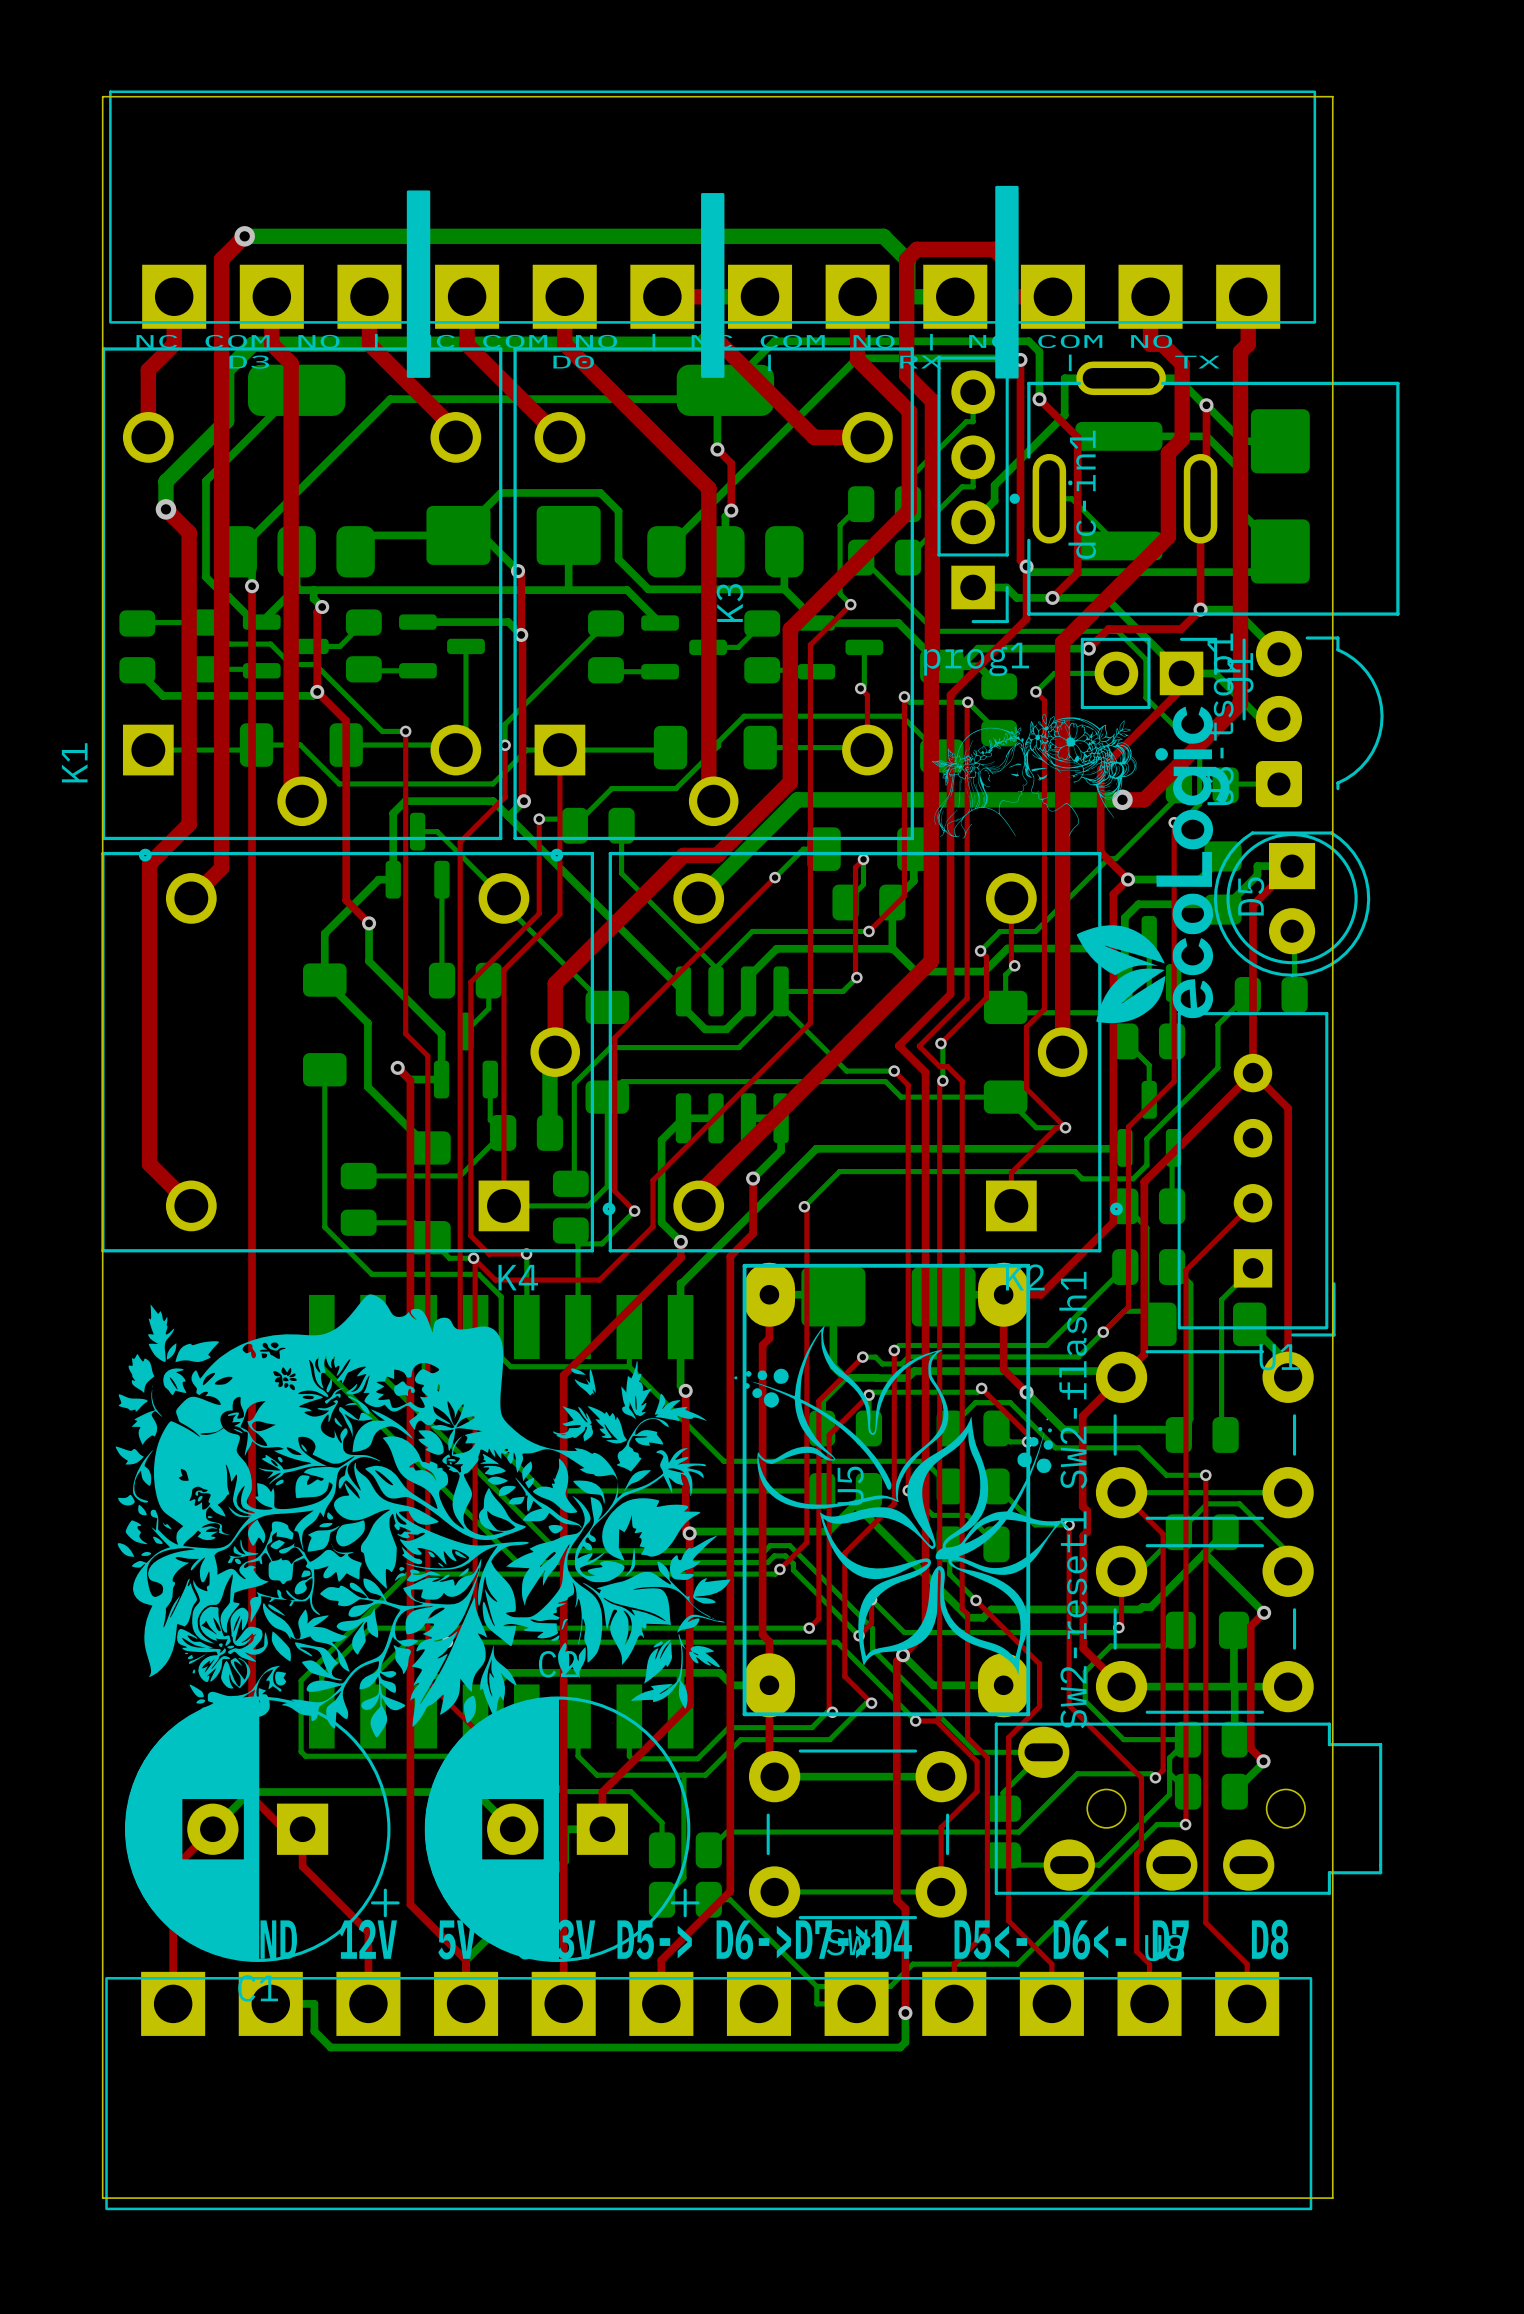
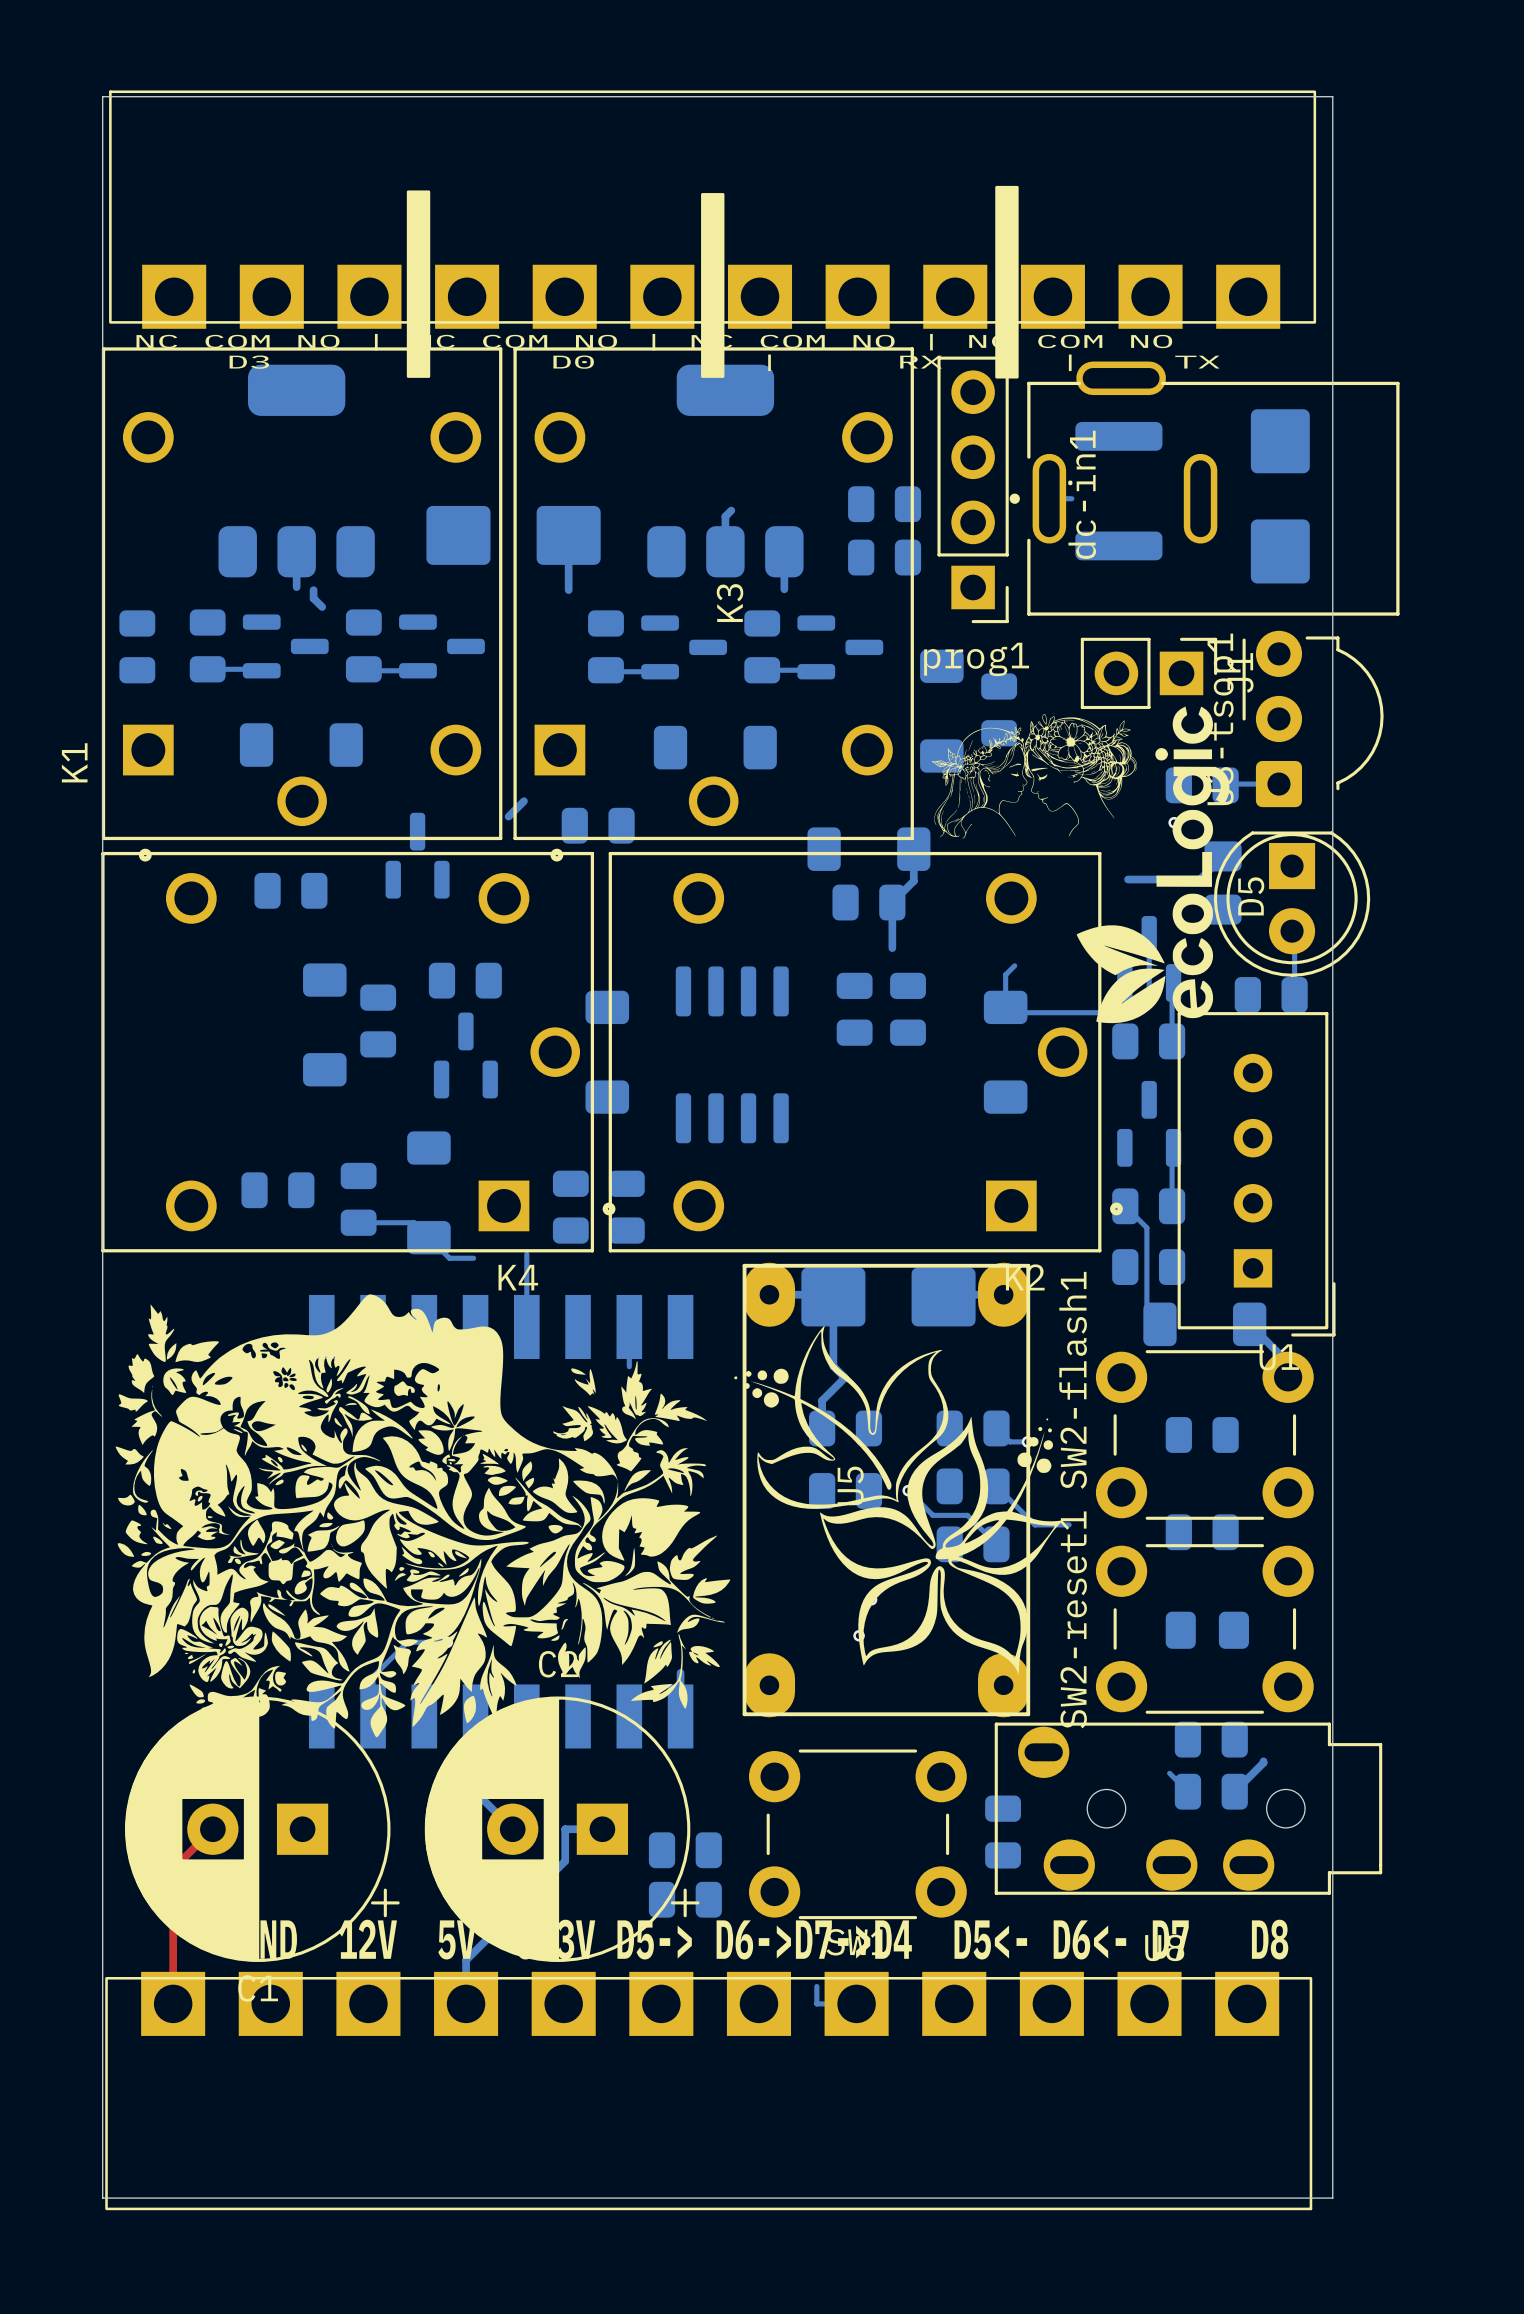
bottom track: (244, 236) (883, 236) (907, 260) (907, 296) (955, 296) -> none
top track: (244, 236) (221, 259) (221, 868) (191, 898) -> none
via: (244, 236) -> none
top track: (174, 296) (174, 344) (148, 370) (148, 437) -> none
top track: (271, 296) (271, 344) (291, 363) (291, 790) (302, 801) -> none
top track: (369, 296) (369, 344) (455, 430) (455, 437) -> none
top track: (467, 296) (467, 344) (559, 437) -> none
top track: (564, 296) (564, 344) (708, 488) (708, 796) (713, 801) -> none
top track: (662, 296) (709, 296) (709, 332) (814, 437) (867, 437) -> none
bottom track: (760, 296) (712, 296) (712, 332) (701, 344) (252, 344) (226, 370) (226, 420) (165, 481) (165, 509) -> none
top track: (857, 296) (857, 359) (909, 411) (909, 510) (790, 629) (790, 782) (717, 855) (683, 855) (555, 983) (555, 1052) -> none
top track: (1052, 296) (1005, 296) (1005, 260) (994, 249) (916, 249) (906, 259) (906, 375) (932, 401) (931, 961) (698, 1193) (698, 1205) -> none
top track: (1150, 296) (1150, 344) (1162, 344) (1182, 363) (1182, 439) (1168, 453) (1168, 536) (1062, 642) (1062, 1052) -> none
top track: (1248, 296) (1248, 344) (1240, 351) (1240, 703) (1144, 799) (1122, 799) -> none
bottom track: (1020, 359) (1018, 358) (857, 358) (666, 549) (666, 551) -> none
top track: (1020, 359) (1020, 560) (1026, 566) (1026, 618) (950, 694) (950, 994) (898, 1045) (925, 1072) (925, 1632) (896, 1661) (896, 1900) (905, 1908) (905, 2012) -> none
via: (1020, 359) -> none
bottom track: (296, 390) (205, 480) (205, 577) (254, 622) (261, 622) (296, 587) (299, 590) (627, 590) (660, 623) -> none
bottom track: (973, 392) (973, 421) (966, 421) (907, 479) (907, 504) -> none
bottom track: (717, 399) (390, 399) (237, 551) (252, 566) (252, 586) -> none
bottom track: (1039, 399) (1039, 351) (1028, 341) (774, 341) (717, 398) (717, 449) -> none
top track: (1039, 399) (1077, 437) (1077, 572) (1052, 597) -> none
via: (1039, 399) -> none
top track: (1206, 405) (1206, 492) (1200, 498) (1200, 609) (1181, 629) (1108, 629) (1088, 648) -> none
via: (1206, 405) -> none
bottom track: (1118, 436) (1206, 436) (1237, 467) (1237, 508) (1280, 551) (1259, 572) (1032, 572) (1026, 566) -> none
bottom track: (1280, 441) (1242, 441) (1177, 378) (1064, 378) (1064, 415) (994, 485) (994, 500) (973, 522) -> none
top track: (717, 449) (731, 463) (731, 510) -> none
via: (717, 449) -> none
bottom track: (973, 457) (973, 486) (962, 486) (935, 513) (935, 529) (907, 557) -> none
bottom track: (1071, 498) (1118, 545) -> none
bottom track: (861, 504) (840, 525) (840, 593) (850, 604) -> none
top track: (165, 509) (189, 532) (189, 824) (149, 863) (149, 1164) (191, 1205) -> none
via: (165, 509) -> none
via: (731, 510) -> none
bottom track: (458, 535) (500, 492) (600, 492) (618, 511) (618, 559) (648, 589) (784, 589) (816, 623) (898, 623) (941, 666) (978, 666) (999, 686) -> none
bottom track: (355, 551) (371, 535) (482, 535) (518, 571) -> none
bottom track: (861, 557) (934, 631) (1117, 631) (1145, 659) (1145, 697) (1199, 751) (1199, 803) (1180, 822) (1174, 822) -> none
via: (1026, 566) -> none
top track: (518, 571) (521, 574) (523, 801) -> none
via: (518, 571) -> none
top track: (252, 586) (252, 1797) (302, 1847) -> none
via: (252, 586) -> none
bottom track: (973, 587) (1006, 587) (1016, 597) (1106, 597) (1181, 673) (1214, 673) (1260, 718) (1278, 718) -> none
via: (1052, 597) -> none
top track: (850, 604) (810, 644) (810, 1022) (652, 1180) (652, 1226) (599, 1280) (495, 1280) (473, 1258) -> none
via: (850, 604) -> none
top track: (322, 607) (317, 611) (317, 691) (346, 720) (346, 900) (369, 923) -> none
via: (322, 607) -> none
bottom track: (1200, 609) (1234, 609) (1278, 653) -> none
via: (1200, 609) -> none
bottom track: (363, 622) (339, 646) (309, 646) -> none
bottom track: (417, 622) (508, 622) (521, 634) -> none
bottom track: (137, 623) (207, 622) (229, 644) (270, 644) (291, 664) (315, 664) (382, 731) (405, 731) -> none
bottom track: (605, 623) (505, 724) (505, 745) -> none
bottom track: (762, 623) (738, 647) (708, 647) -> none
via: (521, 634) -> none
bottom track: (465, 646) (465, 729) (450, 745) -> none
bottom track: (864, 647) (864, 684) (860, 688) -> none
bottom track: (1088, 648) (978, 648) (960, 666) -> none
via: (1088, 648) -> none
bottom track: (137, 670) (162, 695) (313, 695) (317, 691) -> none
bottom track: (1116, 673) (1054, 673) (1035, 691) -> none
top track: (1181, 673) (1181, 688) (1100, 769) (1100, 852) (1128, 879) (1113, 894) (1113, 1222) (1040, 1294) (1003, 1294) (1003, 1369) (1026, 1392) -> none
top track: (860, 688) (867, 695) (867, 750) -> none
via: (860, 688) -> none
via: (317, 691) -> none
top track: (1035, 691) (1044, 700) (1044, 1008) (1026, 1026) (1026, 1088) (1065, 1127) (1056, 1127) (1011, 1172) (1011, 1205) -> none
via: (1035, 691) -> none
bottom track: (904, 696) (909, 702) (968, 702) (999, 733) -> none
top track: (904, 696) (904, 896) (869, 931) -> none
via: (904, 696) -> none
top track: (967, 702) (967, 998) (919, 1046) (939, 1066) (947, 1066) (962, 1081) (962, 1608) (967, 1614) (967, 1737) (987, 1757) (987, 1930) (954, 1964) (954, 2003) -> none
via: (967, 702) -> none
top track: (405, 731) (405, 1033) (427, 1055) (427, 1681) (529, 1783) -> none
via: (405, 731) -> none
bottom track: (346, 745) (450, 745) -> none
top track: (505, 745) (505, 797) (460, 842) (461, 1389) -> none
via: (505, 745) -> none
bottom track: (670, 747) (668, 750) (526, 750) (492, 783) (339, 783) (300, 745) (256, 745) (251, 750) (148, 750) -> none
bottom track: (760, 747) (865, 747) (867, 750) -> none
top track: (559, 750) (559, 913) (503, 969) (503, 1205) -> none
bottom track: (941, 756) (902, 716) (744, 716) (718, 741) (718, 745) (676, 788) (611, 788) (574, 825) (568, 819) (539, 819) -> none
bottom track: (1178, 785) (1178, 795) (1115, 858) (1108, 858) (1035, 931) (1000, 931) (980, 950) -> none
bottom track: (1122, 799) (797, 799) (698, 898) -> none
via: (1122, 799) -> none
via: (523, 801) -> none
top track: (539, 819) (539, 913) (470, 982) (470, 1235) (488, 1254) (526, 1254) -> none
via: (539, 819) -> none
top track: (1174, 822) (1174, 1081) (1128, 1127) (1128, 1306) (1103, 1332) -> none
bottom track: (621, 825) (621, 873) (715, 967) -> none
bottom track: (417, 831) (437, 831) (503, 898) (503, 904) (607, 1007) -> none
bottom track: (824, 849) (803, 849) (775, 877) -> none
bottom track: (863, 859) (863, 884) (845, 902) -> none
top track: (863, 859) (855, 867) (856, 977) -> none
via: (863, 859) -> none
bottom track: (1292, 866) (1257, 866) (1257, 875) (1223, 909) (1217, 904) (1138, 904) (1124, 917) (1124, 982) (1090, 948) (1007, 948) (984, 971) (915, 971) (892, 948) (776, 948) (748, 976) (748, 1007) (726, 1029) (705, 1029) (683, 1007) (683, 991) (493, 801) (405, 801) (393, 813) (393, 879) (378, 879) (324, 933) (324, 980) (367, 1023) (367, 1086) (428, 1147) -> none
top track: (1292, 866) (1253, 905) (1253, 1073) -> none
top track: (775, 877) (614, 1037) (614, 1191) (634, 1211) -> none
via: (775, 877) -> none
bottom track: (441, 879) (441, 980) -> none
via: (1128, 879) -> none
part: none -> (290, 890)
top track: (1011, 898) (1011, 962) (1014, 965) -> none
bottom track: (369, 923) (369, 961) (441, 1033) (441, 1079) (409, 1079) (397, 1067) -> none
via: (369, 923) -> none
bottom track: (869, 931) (752, 931) (715, 967) -> none
via: (869, 931) -> none
top track: (980, 950) (986, 956) (986, 998) (940, 1043) -> none
via: (980, 950) -> none
via: (1014, 965) -> none
bottom track: (856, 977) (843, 991) (781, 991) (781, 1005) -> none
via: (856, 977) -> none
bottom track: (488, 980) (488, 1008) (465, 1031) -> none
bottom track: (1247, 994) (1217, 1024) (1217, 1067) (1146, 1138) (1146, 1165) (1133, 1178) (1082, 1178) (1075, 1171) (839, 1171) (804, 1206) -> none
bottom track: (781, 1005) (846, 1071) (894, 1071) -> none
bottom track: (781, 1005) (738, 1047) (610, 1047) (574, 1083) (574, 1180) (570, 1183) -> none
part: none -> (854, 1009)
part: none -> (908, 1009)
part: none -> (378, 1021)
bottom track: (1125, 1041) (1149, 1065) (1149, 1099) -> none
bottom track: (940, 1043) (942, 1045) (942, 1080) -> none
via: (940, 1043) -> none
bottom track: (555, 1052) (549, 1057) (549, 1132) -> none
top track: (397, 1067) (410, 1080) (410, 1904) (466, 1960) (466, 2003) -> none
via: (397, 1067) -> none
bottom track: (324, 1069) (324, 1227) (371, 1274) (478, 1274) (501, 1296) (501, 1357) (510, 1366) (629, 1366) (723, 1461) (924, 1461) (949, 1486) -> none
top track: (894, 1071) (908, 1085) (908, 1490) -> none
via: (894, 1071) -> none
top track: (1253, 1073) (1288, 1108) (1288, 1377) -> none
top track: (1253, 1073) (1144, 1181) (1144, 1354) (1082, 1416) (1082, 1506) (1087, 1510) (1087, 1532) (1083, 1535) (1083, 1648) (1121, 1686) -> none
bottom track: (490, 1079) (490, 1120) (503, 1132) (460, 1175) (358, 1175) -> none
top track: (942, 1080) (939, 1084) (939, 1717) (936, 1720) -> none
via: (942, 1080) -> none
bottom track: (715, 1118) (683, 1118) (661, 1140) (661, 1222) (680, 1241) -> none
bottom track: (748, 1118) (781, 1118) (781, 1150) (753, 1178) -> none
bottom track: (1065, 1127) (1036, 1127) (1005, 1097) (901, 1097) (885, 1081) (622, 1081) (607, 1097) (607, 1186) (587, 1205) (503, 1205) -> none
via: (1065, 1127) -> none
part: (526, 1132) -> none
bottom track: (1124, 1147) (816, 1148) (680, 1283) (680, 1385) (685, 1390) -> none
top track: (753, 1178) (753, 1233) (730, 1256) (730, 1891) (661, 1960) (661, 2003) -> none
via: (753, 1178) -> none
part: none -> (277, 1190)
top track: (1253, 1203) (1185, 1270) (1185, 1824) -> none
top track: (804, 1206) (806, 1209) (806, 1542) (779, 1569) -> none
via: (804, 1206) -> none
part: none -> (626, 1207)
bottom track: (634, 1211) (601, 1243) (578, 1243) -> none
via: (634, 1211) -> none
bottom track: (570, 1230) (578, 1237) (578, 1326) -> none
top track: (680, 1241) (680, 1258) (563, 1375) (563, 2003) -> none
via: (680, 1241) -> none
via: (526, 1254) -> none
via: (473, 1258) -> none
top track: (475, 1259) (475, 1614) (447, 1642) -> none
bottom track: (1125, 1267) (1046, 1345) (899, 1345) (894, 1350) -> none
bottom track: (1172, 1267) (1189, 1284) (1189, 1418) (1178, 1429) -> none
bottom track: (1253, 1268) (1221, 1299) (1221, 1430) (1225, 1434) -> none
top track: (769, 1294) (769, 1338) (762, 1345) (762, 1634) (769, 1641) (769, 1771) (774, 1776) -> none
bottom track: (1159, 1324) (1146, 1311) (1124, 1311) (1078, 1356) (908, 1356) (901, 1363) (882, 1363) (875, 1357) (862, 1357) -> none
bottom track: (321, 1326) (321, 1366) (517, 1562) (767, 1562) (774, 1555) (785, 1555) (793, 1563) (793, 1570) (859, 1635) -> none
bottom track: (373, 1326) (373, 1366) (557, 1550) (765, 1550) (770, 1545) (789, 1545) (872, 1628) (872, 1649) (975, 1752) (1043, 1752) (1003, 1792) (1003, 1808) -> none
bottom track: (424, 1326) (424, 1372) (543, 1490) (822, 1490) -> none
via: (1103, 1332) -> none
top track: (894, 1350) (894, 1503) (844, 1553) (844, 1676) (871, 1703) -> none
via: (894, 1350) -> none
top track: (862, 1357) (818, 1401) (818, 1618) (809, 1628) -> none
via: (862, 1357) -> none
bottom track: (844, 1377) (876, 1377) -> none
bottom track: (1121, 1377) (1115, 1371) (914, 1371) (907, 1378) (876, 1378) -> none
bottom track: (981, 1388) (977, 1392) (872, 1392) (869, 1395) (869, 1428) -> none
top track: (981, 1388) (1027, 1434) (1027, 1441) -> none
via: (981, 1388) -> none
top track: (685, 1390) (685, 1529) (689, 1533) (689, 1704) (602, 1792) (602, 1829) -> none
via: (685, 1390) -> none
bottom track: (1026, 1392) (1063, 1429) (1178, 1429) -> none
via: (1026, 1392) -> none
top track: (869, 1395) (829, 1435) (829, 1708) (832, 1712) -> none
via: (869, 1395) -> none
bottom track: (949, 1428) (975, 1402) (1010, 1402) (1055, 1447) (1139, 1447) (1166, 1475) (1205, 1475) -> none
top track: (1205, 1475) (1205, 1922) (1247, 1964) (1247, 2003) -> none
via: (1205, 1475) -> none
bottom track: (868, 1490) (828, 1531) (691, 1531) (689, 1533) -> none
bottom track: (1121, 1492) (1288, 1492) -> none
top track: (1121, 1492) (1163, 1534) (1163, 1770) (1155, 1777) -> none
bottom track: (855, 1504) (968, 1617) (983, 1617) (991, 1609) (1140, 1609) (1142, 1607) (1150, 1607) (1225, 1532) -> none
top track: (1069, 1524) (1069, 1705) (1141, 1777) (1141, 1848) (1136, 1853) (1136, 1951) (1149, 1964) (1149, 2003) -> none
via: (1069, 1524) -> none
via: (689, 1533) -> none
bottom track: (949, 1544) (949, 1574) (975, 1600) -> none
bottom track: (1204, 1553) (1264, 1612) -> none
bottom track: (779, 1569) (775, 1574) (407, 1574) (301, 1680) (301, 1751) (305, 1756) (475, 1756) (475, 1716) -> none
via: (779, 1569) -> none
bottom track: (1121, 1571) (1139, 1571) (1207, 1503) (1239, 1503) (1288, 1552) (1288, 1571) -> none
top track: (1121, 1571) (1121, 1625) (1118, 1627) -> none
bottom track: (871, 1599) (904, 1632) (1114, 1632) (1118, 1627) -> none
top track: (871, 1599) (871, 1623) (859, 1635) -> none
top track: (975, 1600) (1039, 1664) (1039, 1706) (1008, 1737) (1008, 1920) (1051, 1964) (1051, 2003) -> none
via: (975, 1600) -> none
top track: (1264, 1612) (1250, 1626) (1250, 1748) (1263, 1761) -> none
via: (1264, 1612) -> none
via: (1118, 1627) -> none
bottom track: (809, 1628) (370, 1628) (321, 1676) (321, 1716) -> none
via: (809, 1628) -> none
bottom track: (1180, 1630) (1164, 1646) (1110, 1646) (1085, 1671) (1085, 1701) (1123, 1739) (1187, 1739) (1169, 1757) (1169, 1794) (1099, 1865) (1012, 1865) (1003, 1855) -> none
bottom track: (1233, 1630) (1233, 1686) -> none
bottom track: (903, 1655) (933, 1685) (1003, 1685) -> none
via: (903, 1655) -> none
bottom track: (769, 1685) (732, 1685) (719, 1672) (507, 1672) (499, 1680) (499, 1767) (475, 1792) (250, 1792) (212, 1829) -> none
bottom track: (1121, 1686) (1288, 1686) -> none
bottom track: (1234, 1686) (1234, 1739) -> none
bottom track: (871, 1703) (866, 1703) (829, 1739) (740, 1739) (705, 1775) (597, 1775) (578, 1756) (578, 1716) -> none
via: (871, 1703) -> none
bottom track: (832, 1712) (827, 1712) (811, 1727) (728, 1727) (697, 1758) (631, 1758) (629, 1756) (629, 1716) -> none
via: (832, 1712) -> none
bottom track: (424, 1716) (424, 1676) (446, 1676) (481, 1642) (837, 1642) (915, 1720) -> none
top track: (915, 1720) (936, 1720) -> none
via: (915, 1720) -> none
top track: (936, 1720) (977, 1761) (977, 1791) (941, 1827) (941, 1891) -> none
bottom track: (526, 1756) (562, 1791) (630, 1791) (662, 1822) (662, 1850) -> none
via: (1263, 1761) -> none
bottom track: (683, 1775) (683, 1877) (662, 1899) -> none
bottom track: (774, 1776) (941, 1776) -> none
bottom track: (1155, 1777) (1151, 1773) (1077, 1773) (1019, 1832) (727, 1832) (708, 1850) -> none
via: (1155, 1777) -> none
bottom track: (1185, 1824) (1157, 1824) (1017, 1964) (912, 1964) (890, 1986) (816, 1986) (730, 1899) (708, 1899) -> none
via: (1185, 1824) -> none
top track: (302, 1829) (302, 1866) (368, 1932) (368, 2003) -> none
bottom track: (774, 1891) (941, 1891) -> none
bottom track: (270, 2003) (314, 2003) (314, 2031) (330, 2047) (900, 2047) (905, 2042) (905, 2012) -> none
via: (905, 2012) -> none

